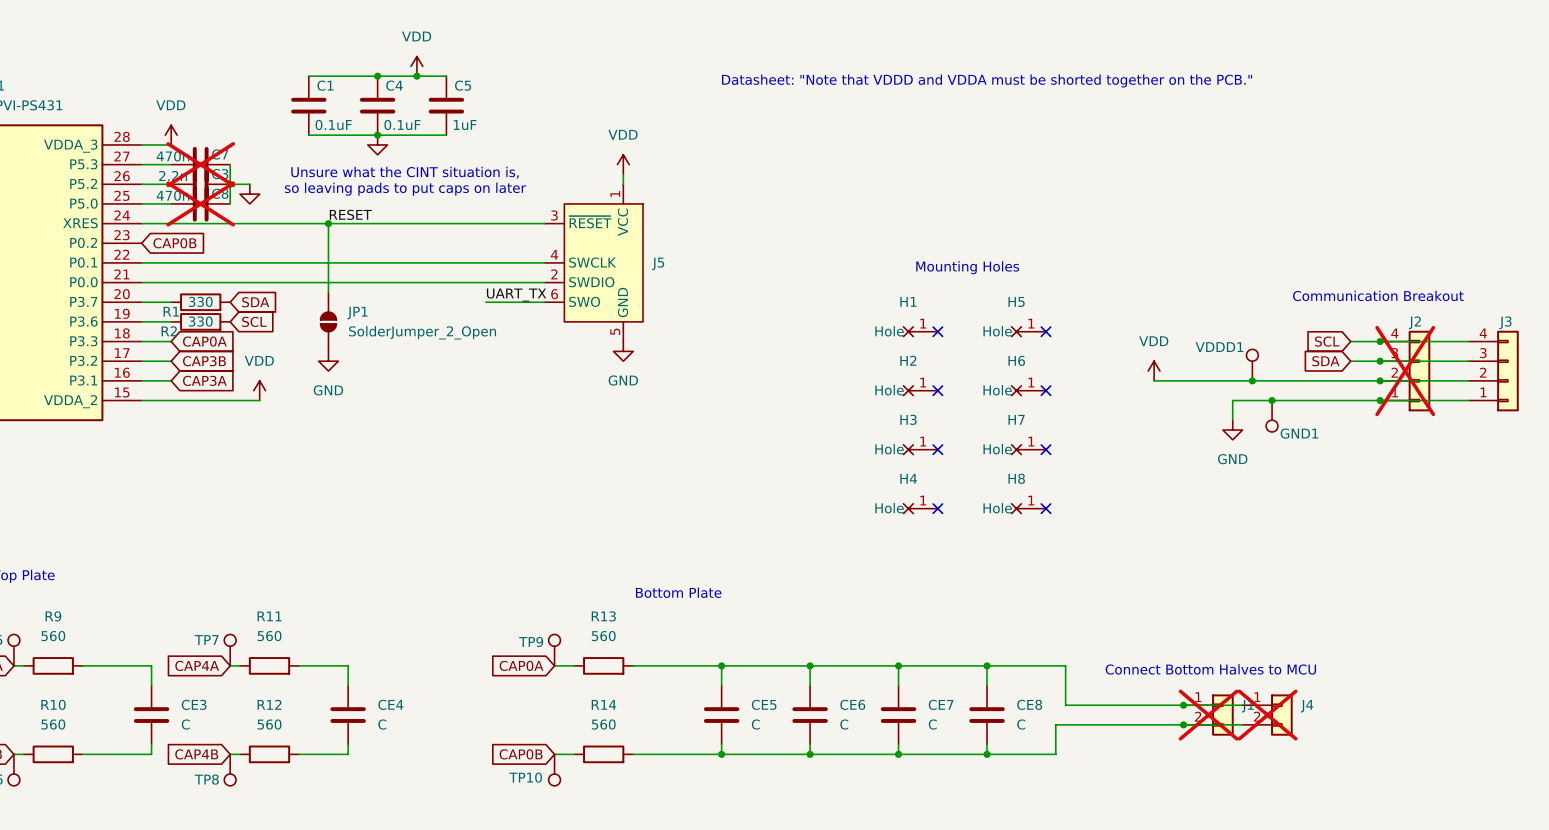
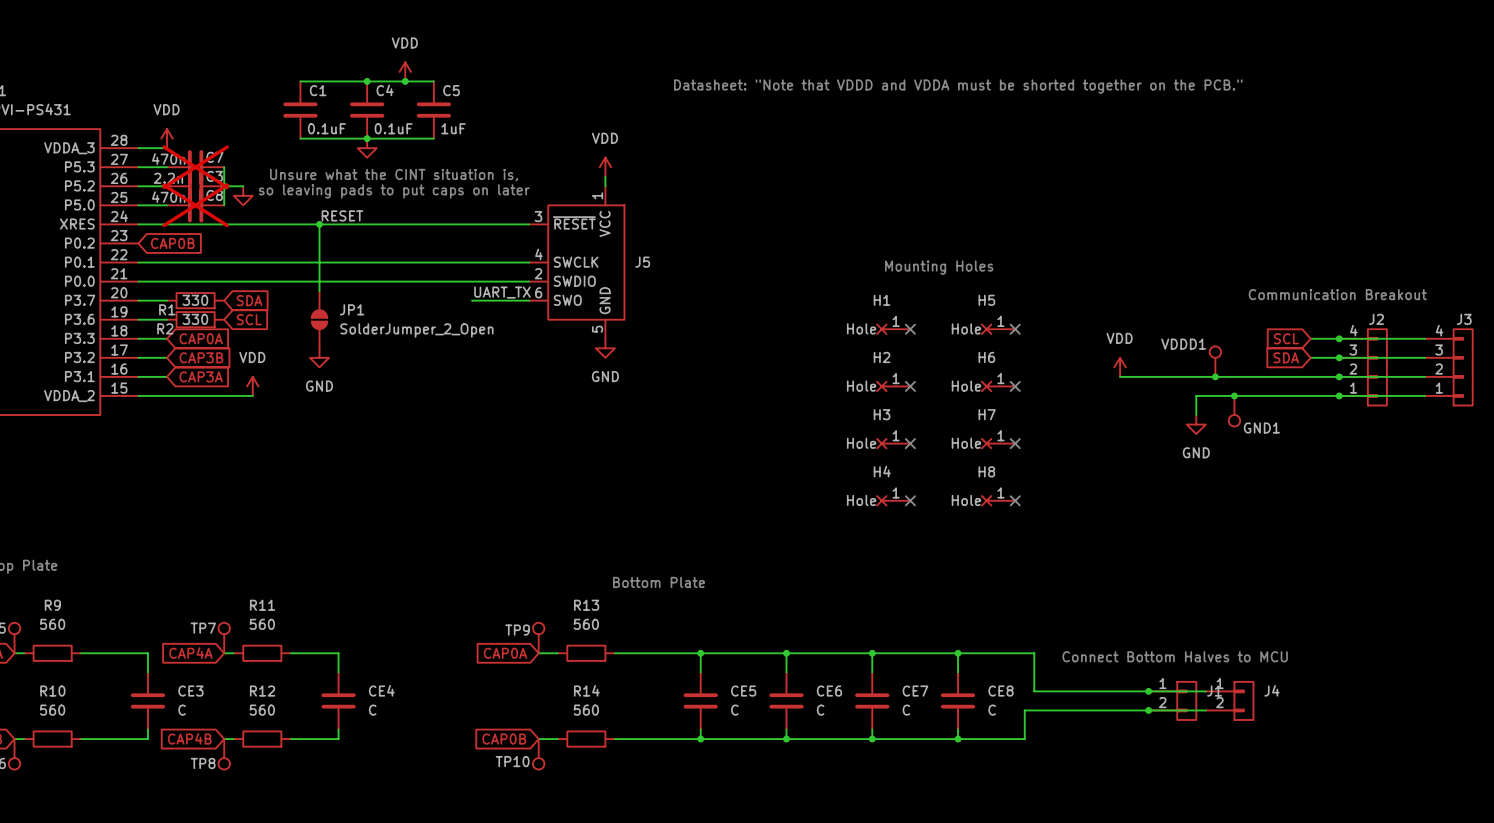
J2 do-not-place cross: (1405, 371) -> none
J1 do-not-place cross: (1208, 715) -> none
J4 do-not-place cross: (1267, 715) -> none

